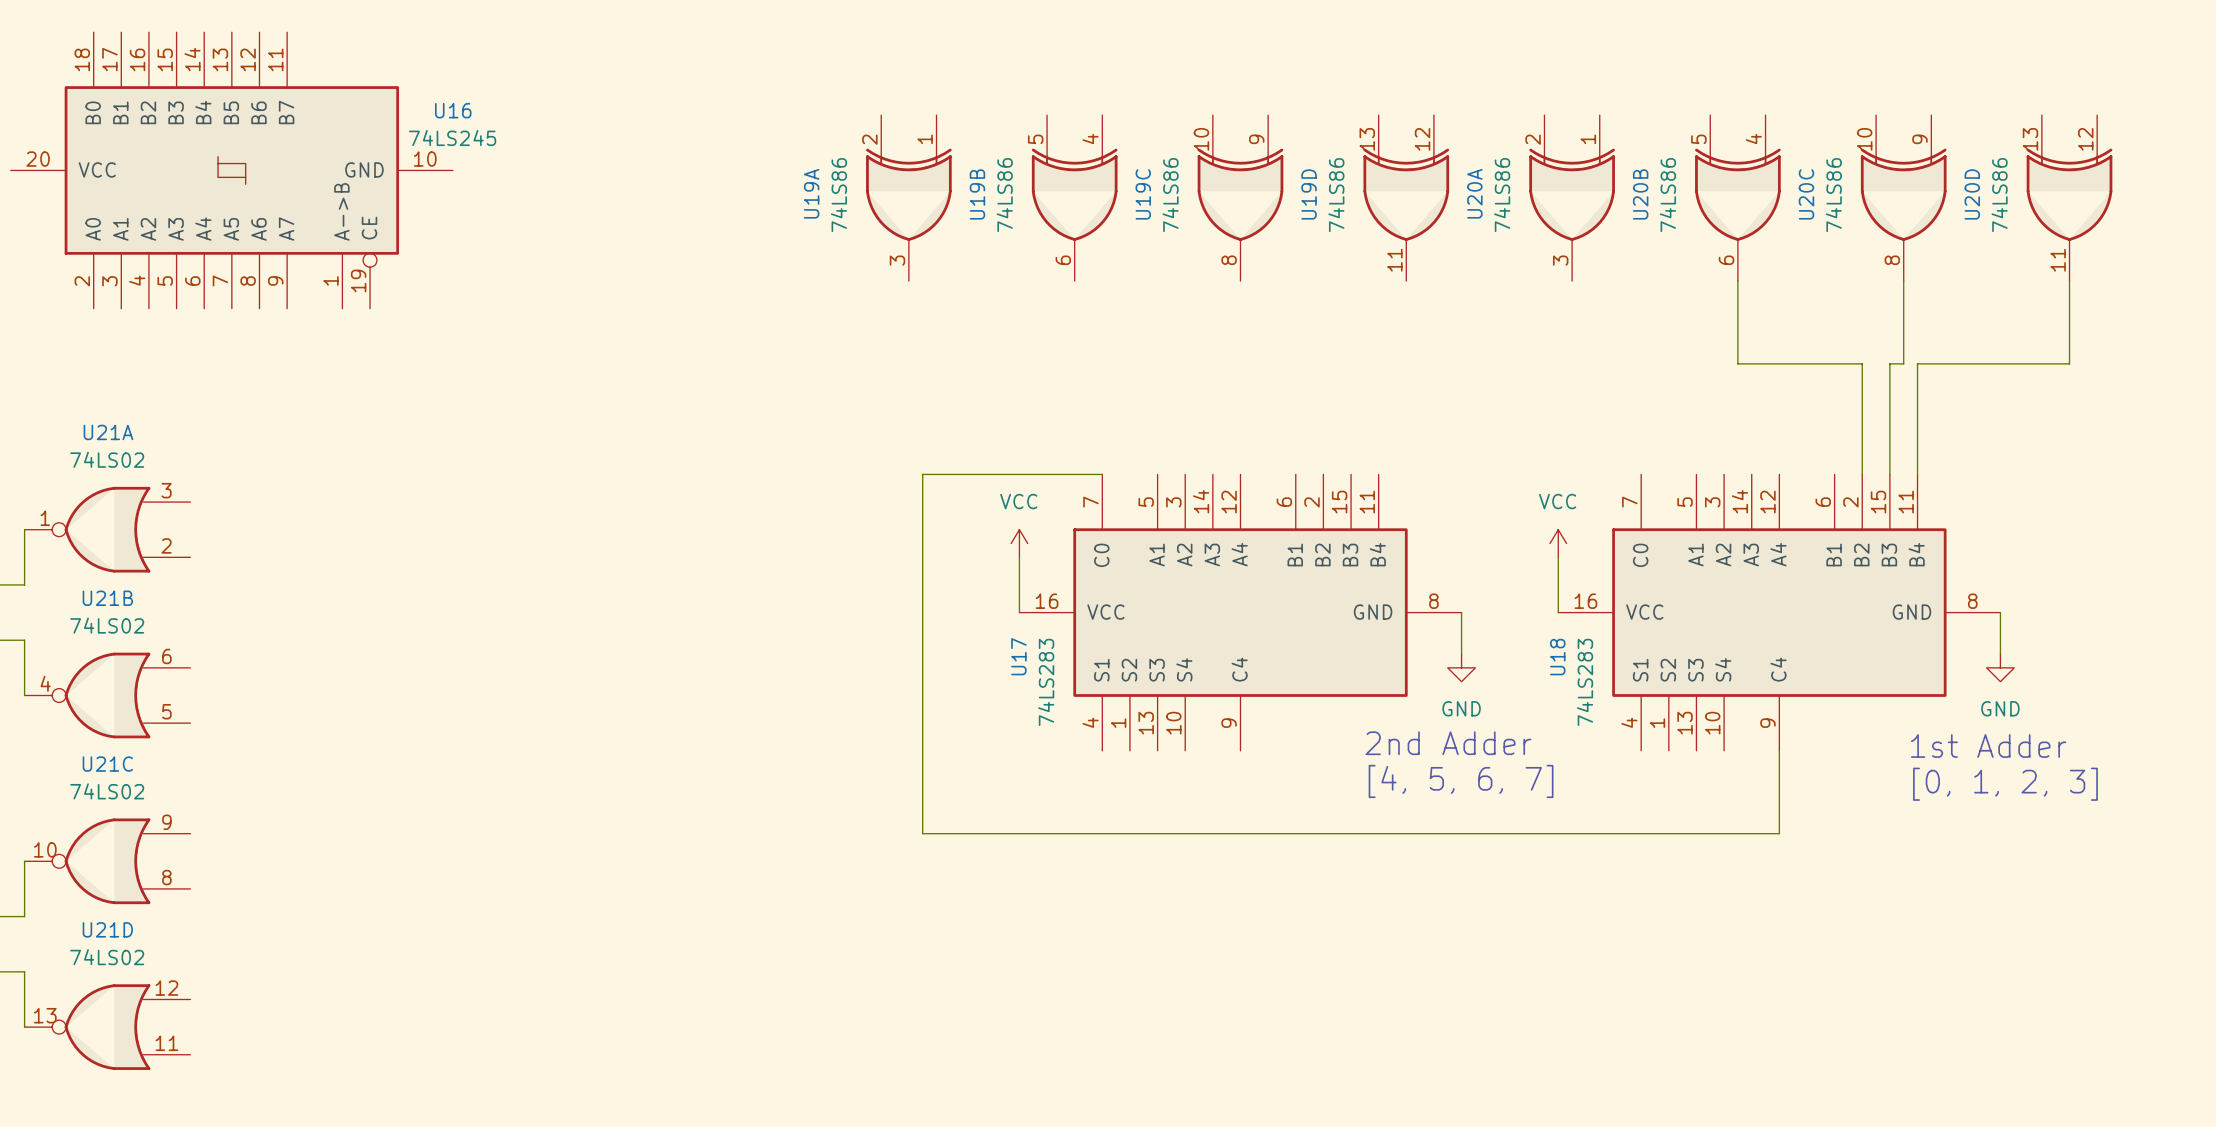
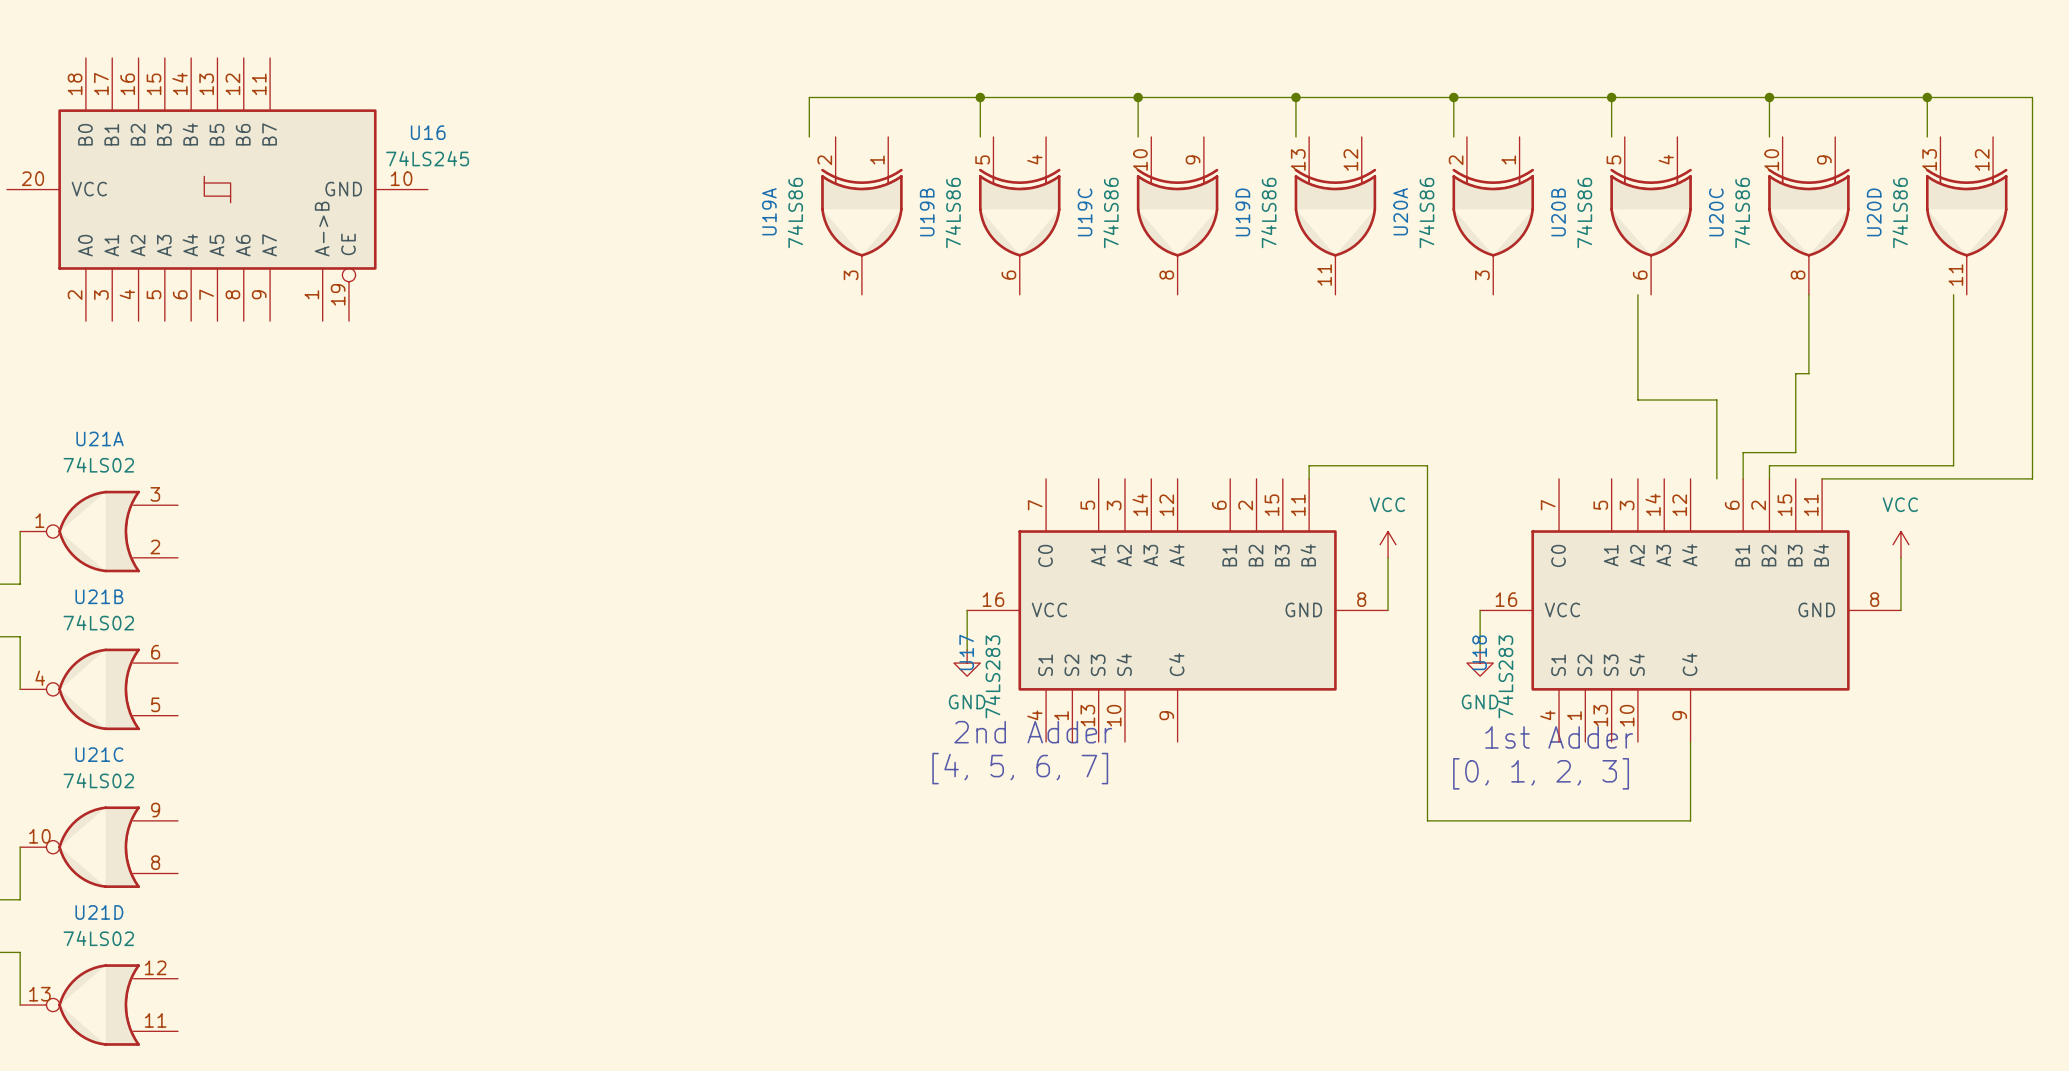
wire: none -> (980, 97) (980, 136)
junction: none -> (980, 97)
wire: none -> (1138, 97) (1138, 136)
junction: none -> (1138, 97)
wire: none -> (1295, 97) (1295, 136)
junction: none -> (1295, 97)
wire: none -> (1453, 97) (1453, 136)
junction: none -> (1453, 97)
wire: none -> (1611, 97) (1611, 136)
junction: none -> (1611, 97)
wire: none -> (1769, 97) (1769, 136)
junction: none -> (1769, 97)
wire: none -> (1927, 97) (1927, 136)
junction: none -> (1927, 97)
wire: none -> (1637, 294) (1637, 400) (1716, 400) (1716, 478)
wire: (1737, 280) (1737, 363) (1862, 363) (1862, 460) -> (1953, 294) (1953, 465) (1769, 465)
wire: (2069, 280) (2069, 363) (1917, 363) (1917, 474) -> (809, 136) (809, 97) (2032, 97) (2032, 478) (1822, 478)
wire: (1889, 446) (1889, 474) -> (1795, 452) (1743, 452) (1743, 478)
wire: (1102, 474) (922, 474) (922, 833) (1503, 833) -> (1309, 478) (1309, 465) (1427, 465) (1427, 820)
power symbol: VCC (1019, 543) -> none
power symbol position: VCC (1558, 543) -> VCC (1388, 544)
power symbol: none -> VCC (1900, 544)
wire: (1019, 557) (1019, 612) -> (967, 649) (967, 610)
wire: (1558, 557) (1558, 612) -> (1480, 649) (1480, 610)
wire: (1461, 612) (1461, 654) -> (1388, 610) (1388, 557)
wire: (2000, 612) (2000, 654) -> (1900, 610) (1900, 557)
power symbol: none -> GND (967, 663)
power symbol position: GND (1461, 667) -> GND (1480, 663)
power symbol: GND (2000, 667) -> none
text position: 2nd Adder (1448, 743) -> 2nd Adder (1033, 732)
text position: 1st Adder (1988, 746) -> 1st Adder (1559, 737)
text position: [4, 5, 6, 7] (1461, 781) -> [4, 5, 6, 7] (1020, 768)
text position: [0, 1, 2, 3] (2005, 784) -> [0, 1, 2, 3] (1541, 773)

